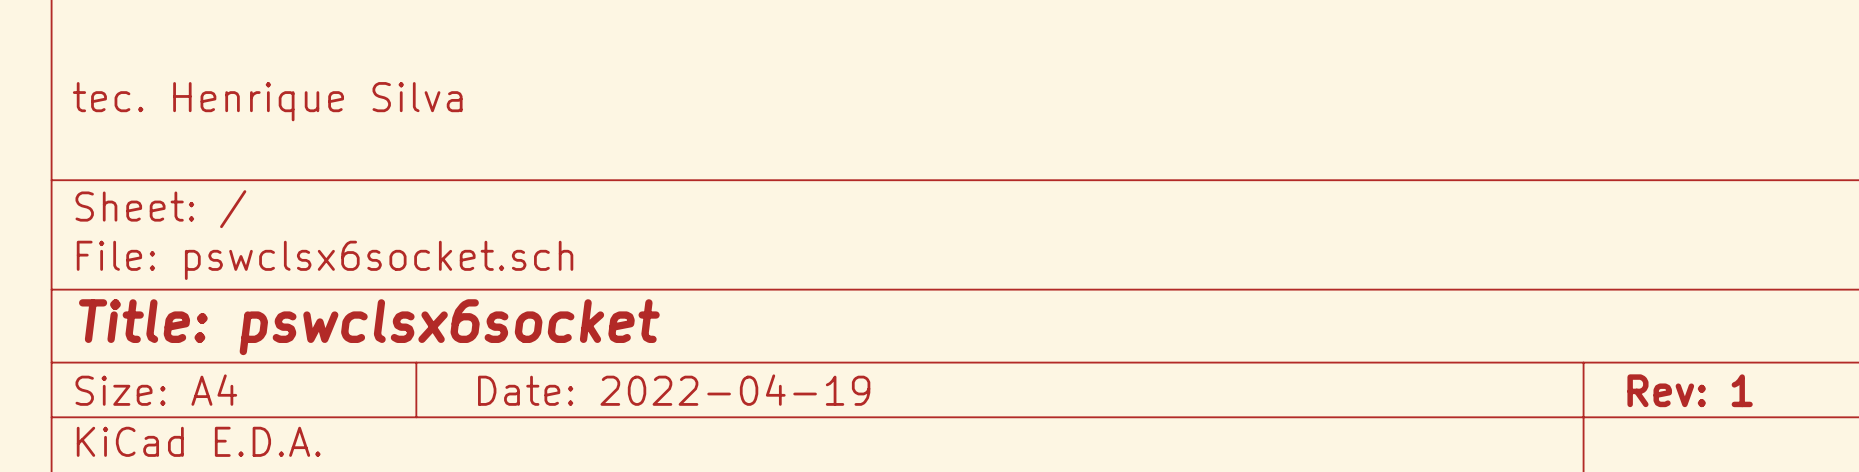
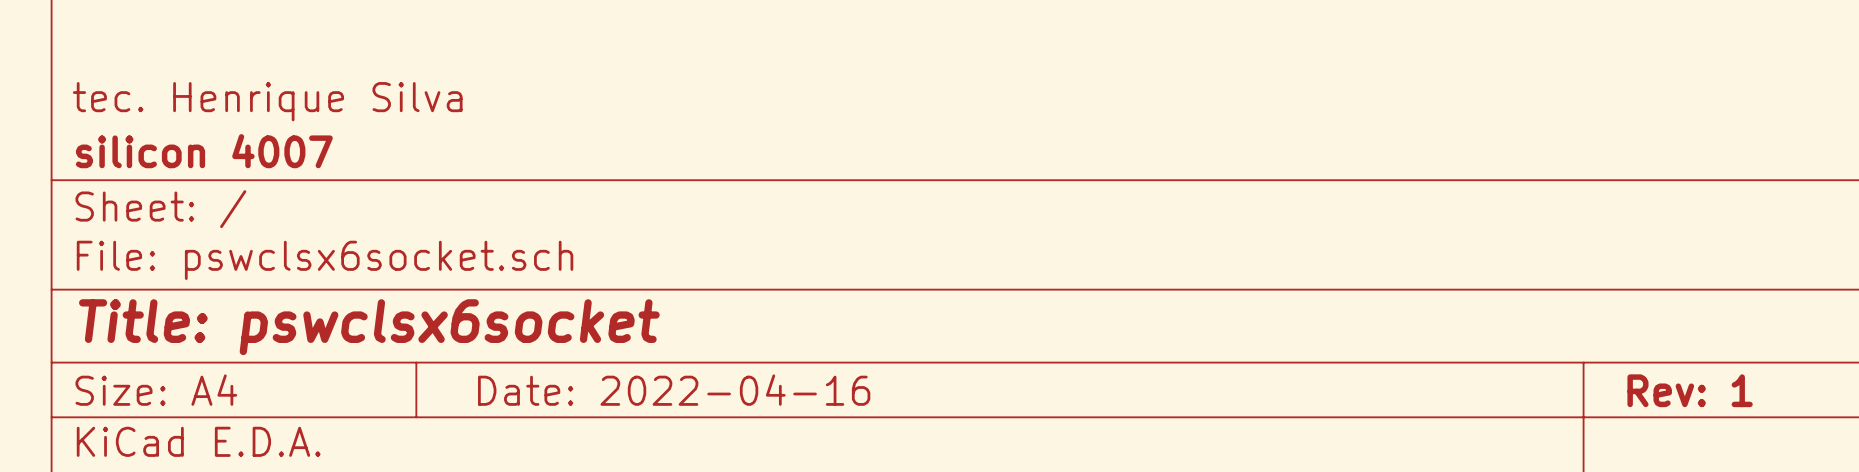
title block: none -> silicon 4007 (204, 151)
title block: Date: 2022-04-19 (674, 390) -> Date: 2022-04-16 (674, 390)

